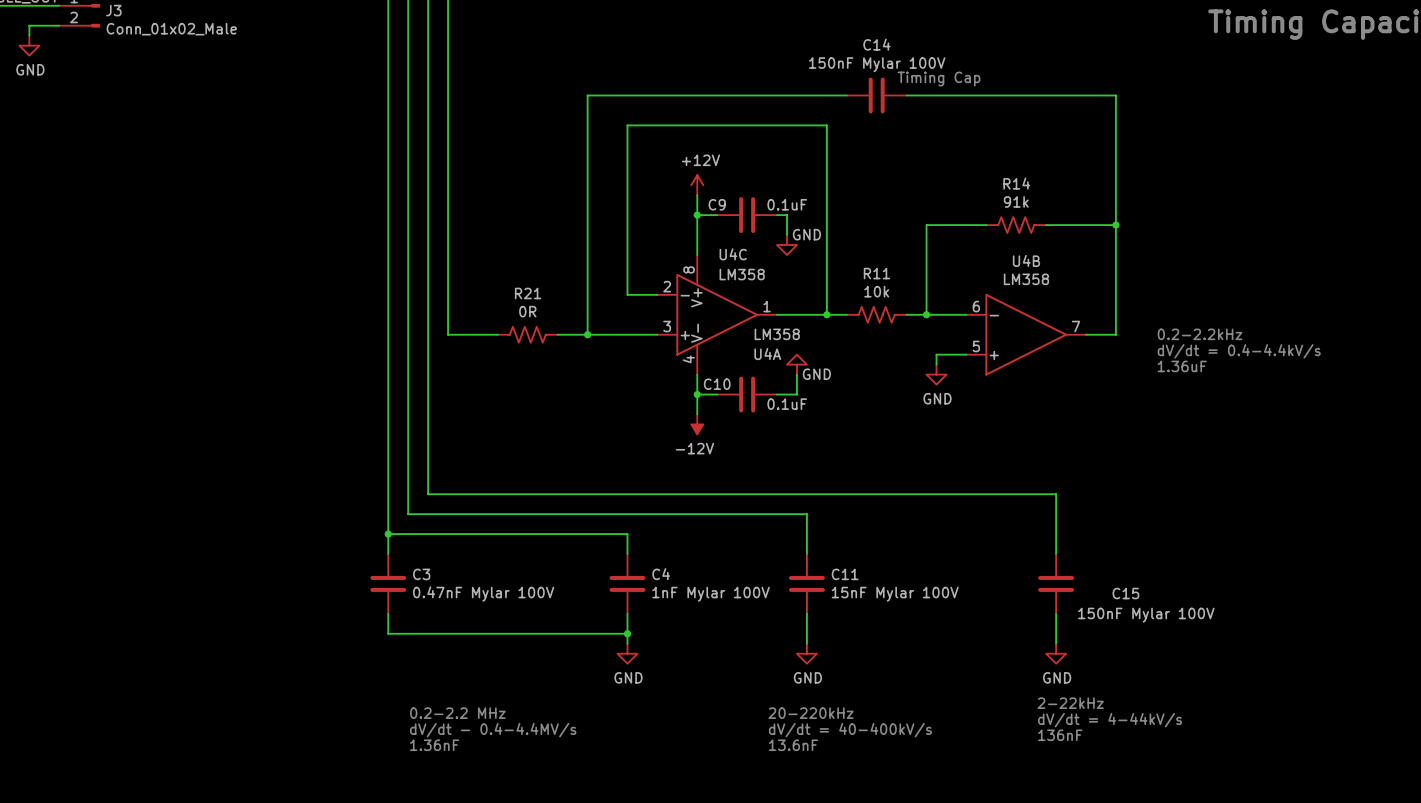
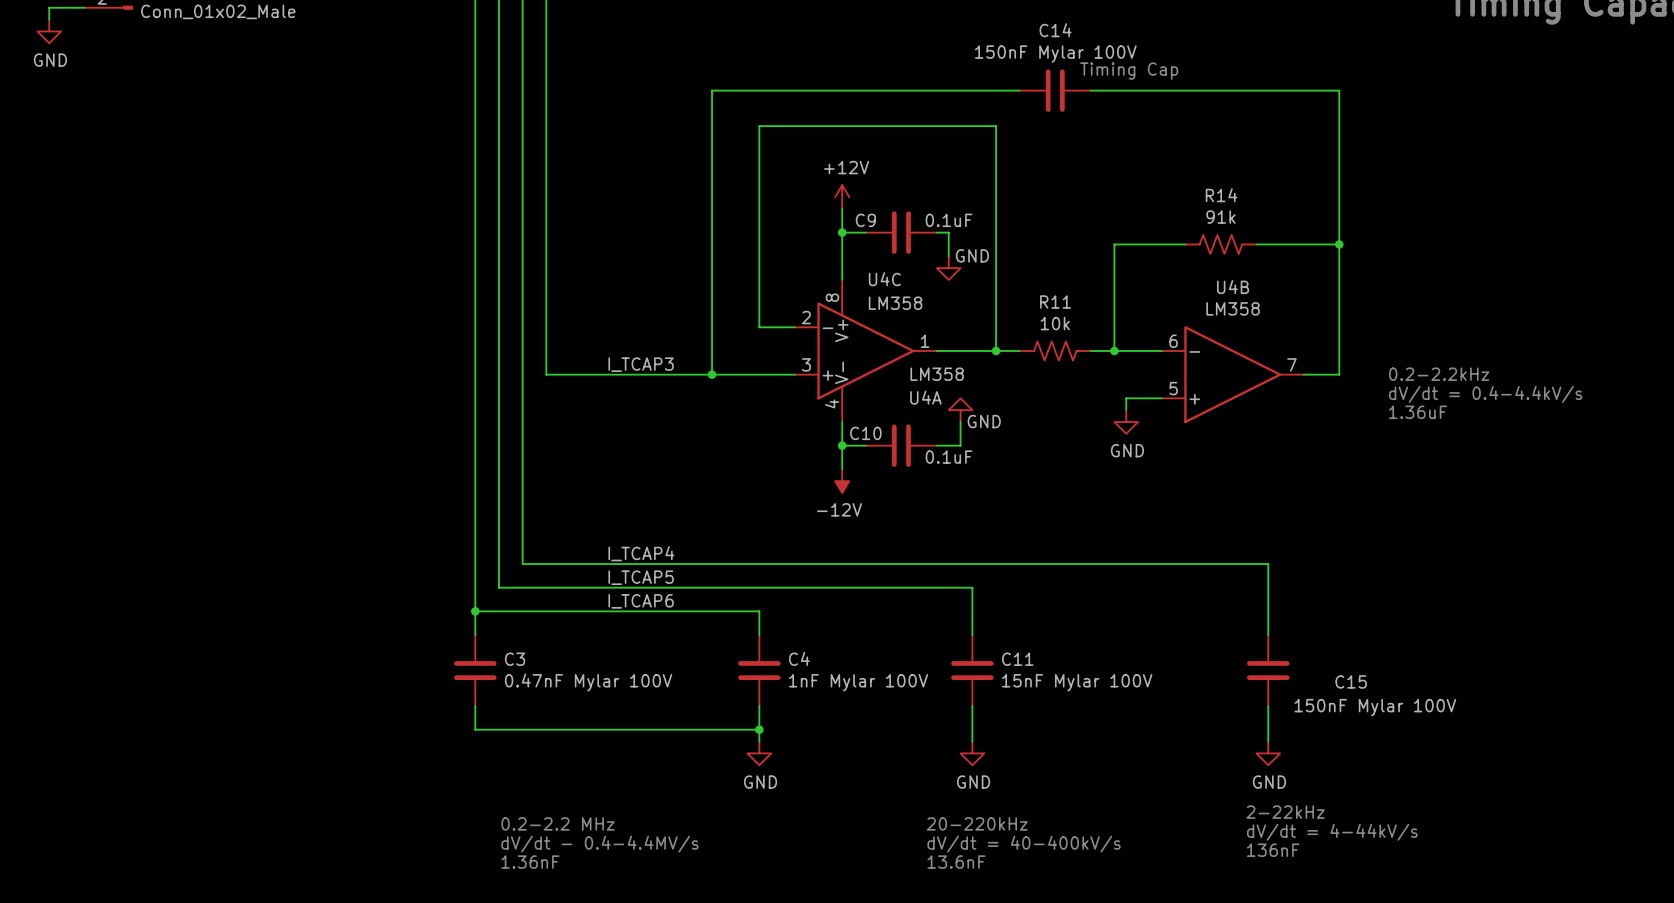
label: none -> I_TCAP3 (641, 364)
R21: 0R (527, 334) -> none
label: none -> I_TCAP4 (641, 553)
label: none -> I_TCAP5 (641, 577)
label: none -> I_TCAP6 (641, 601)

